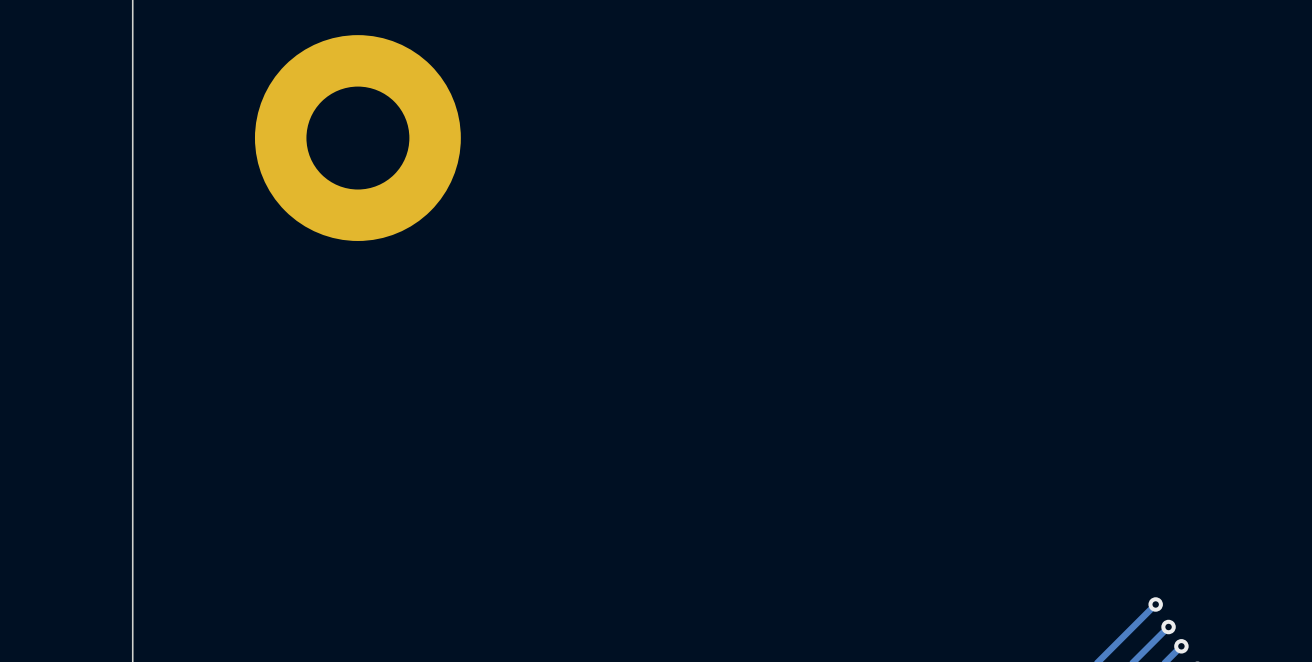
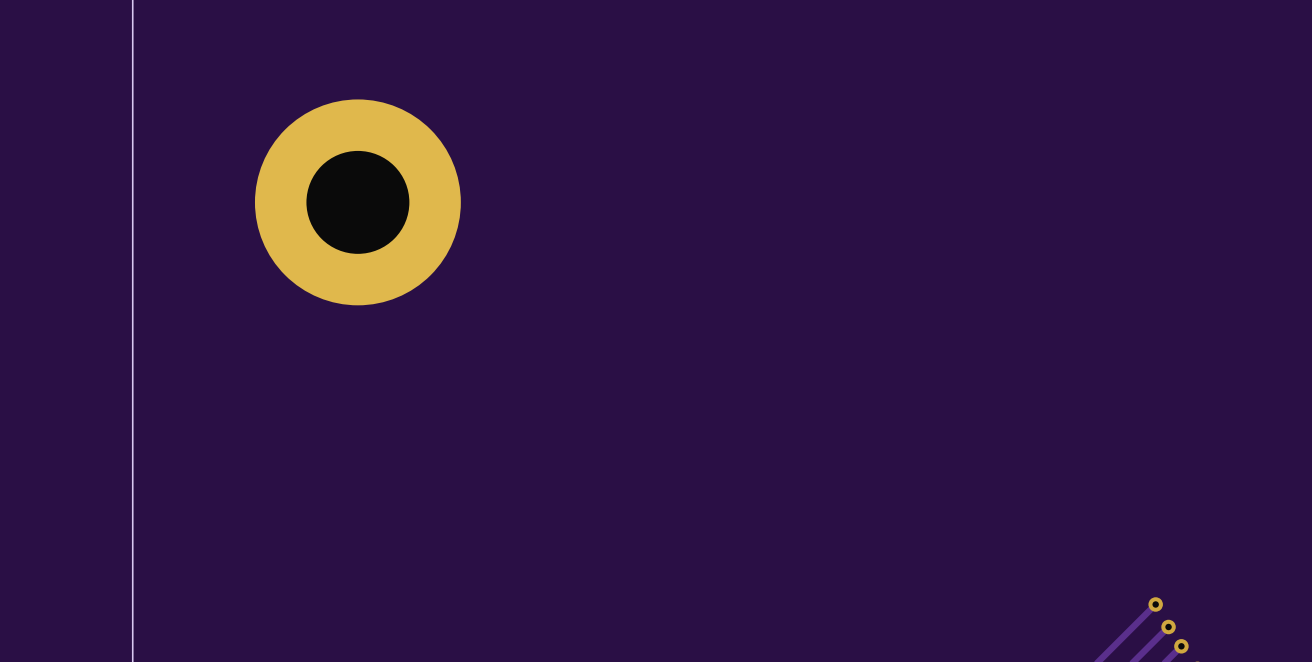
part position: (357, 138) -> (357, 202)

